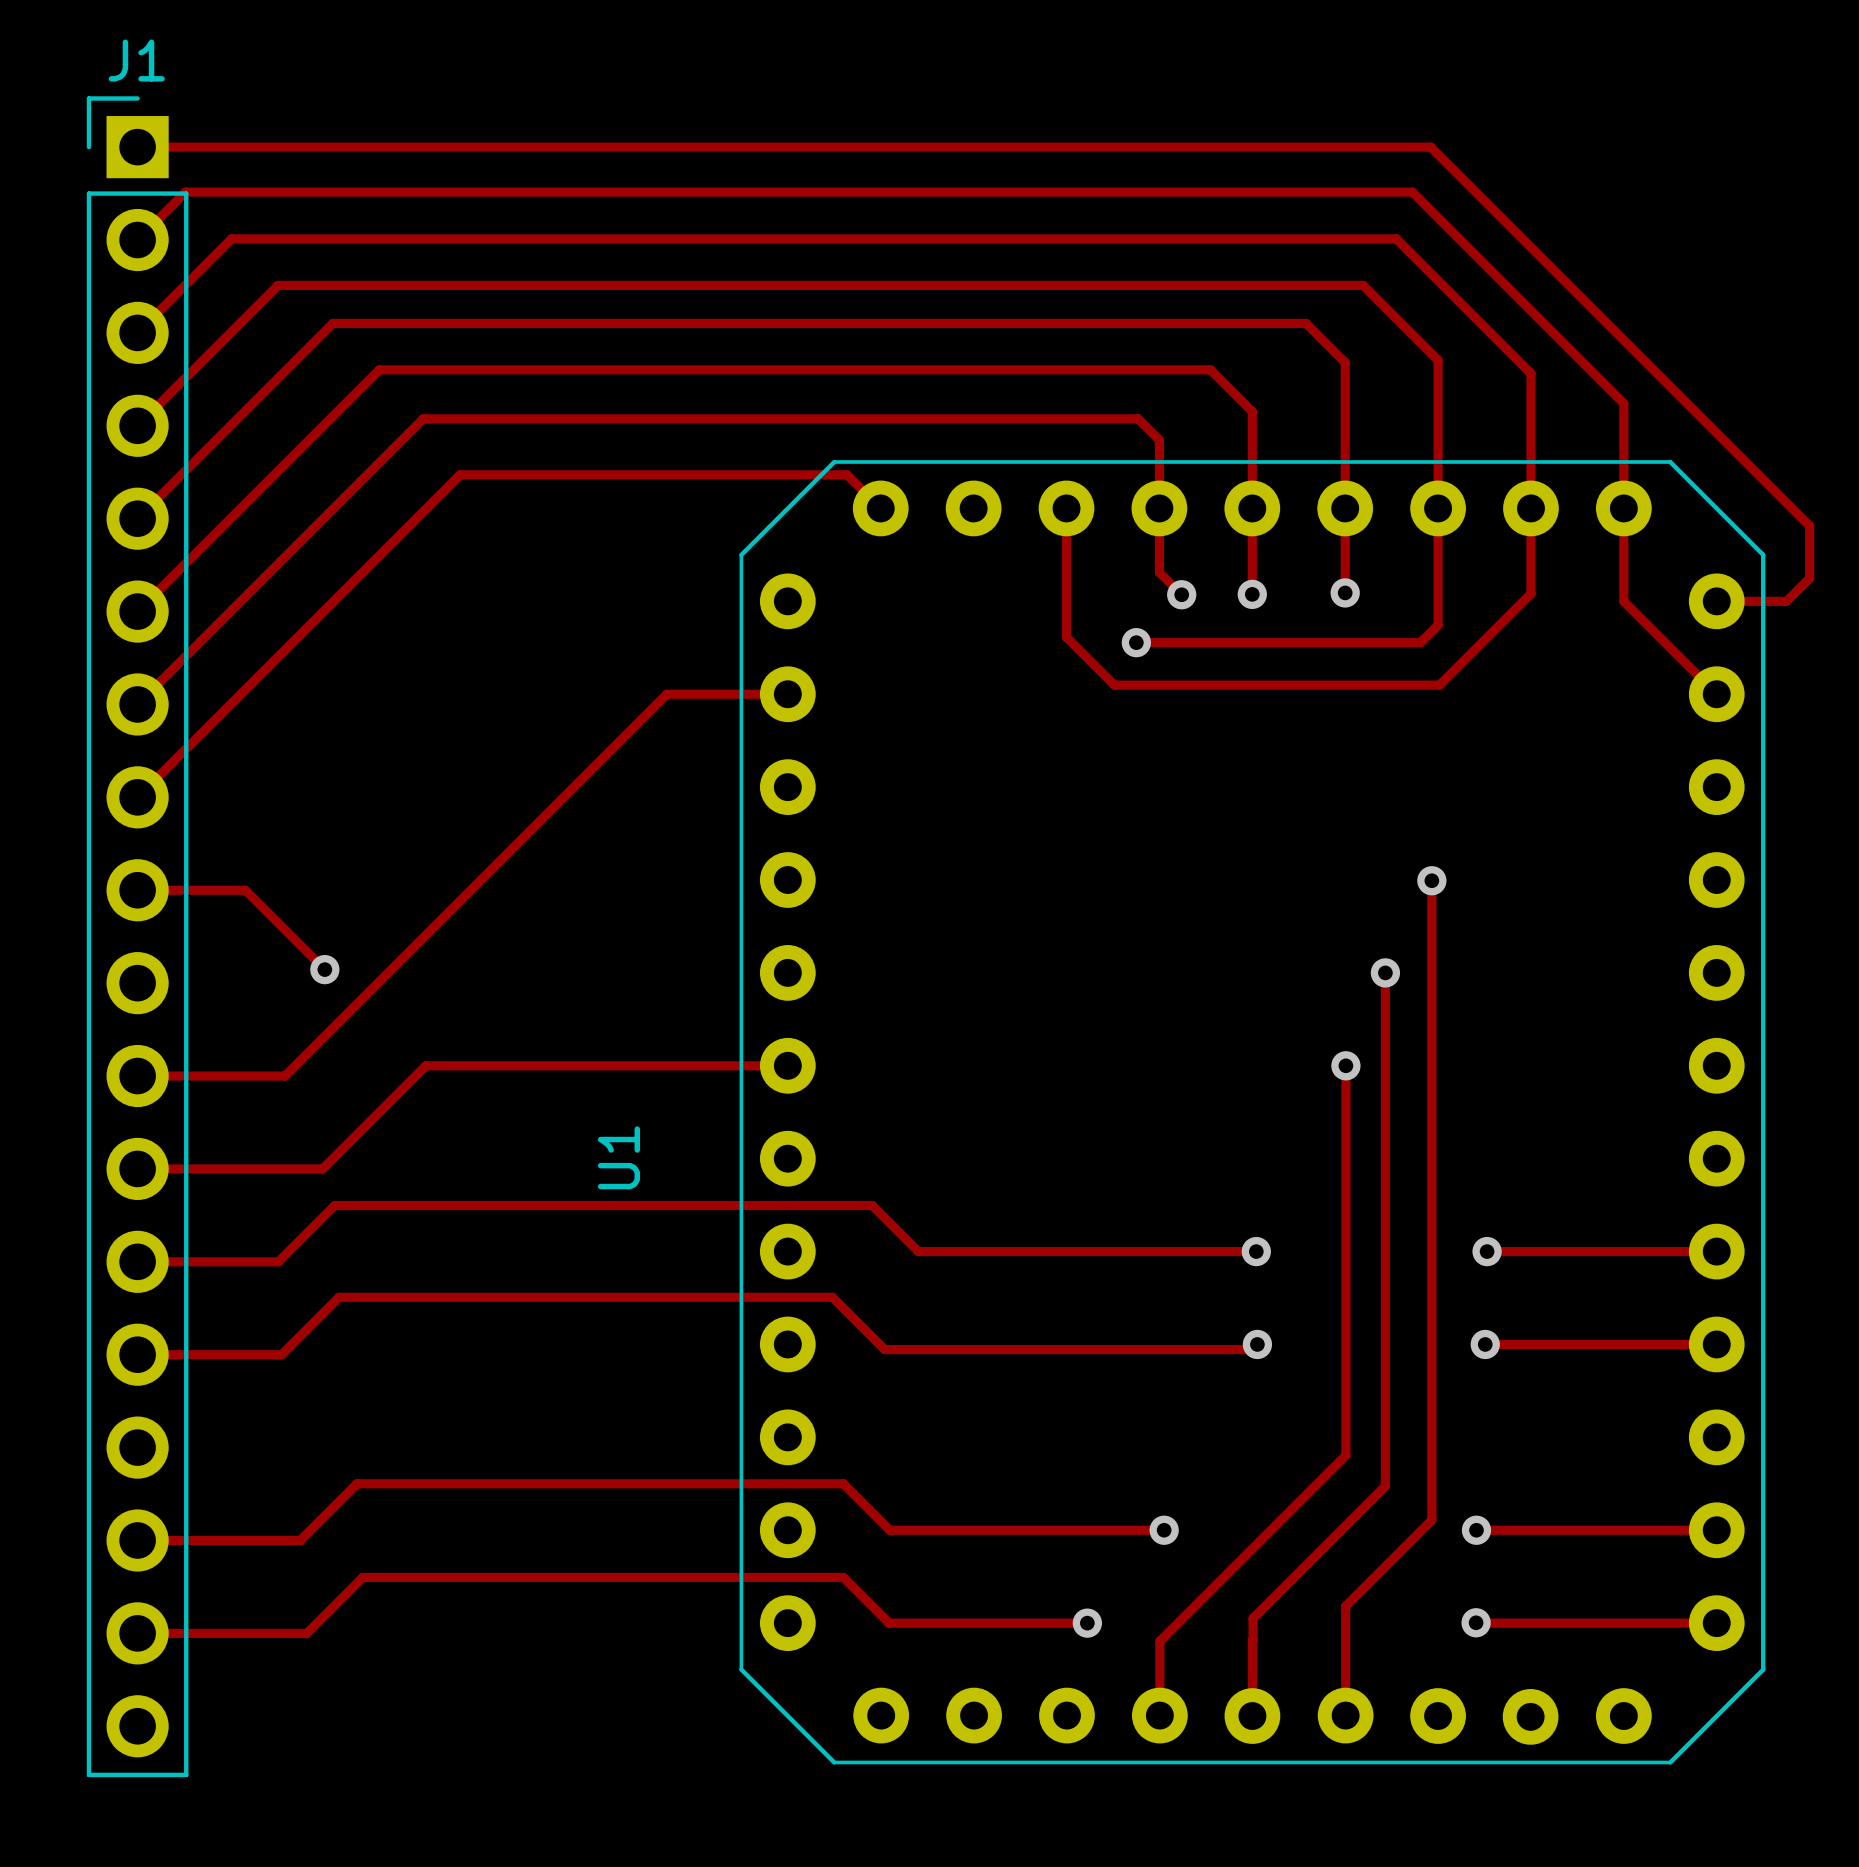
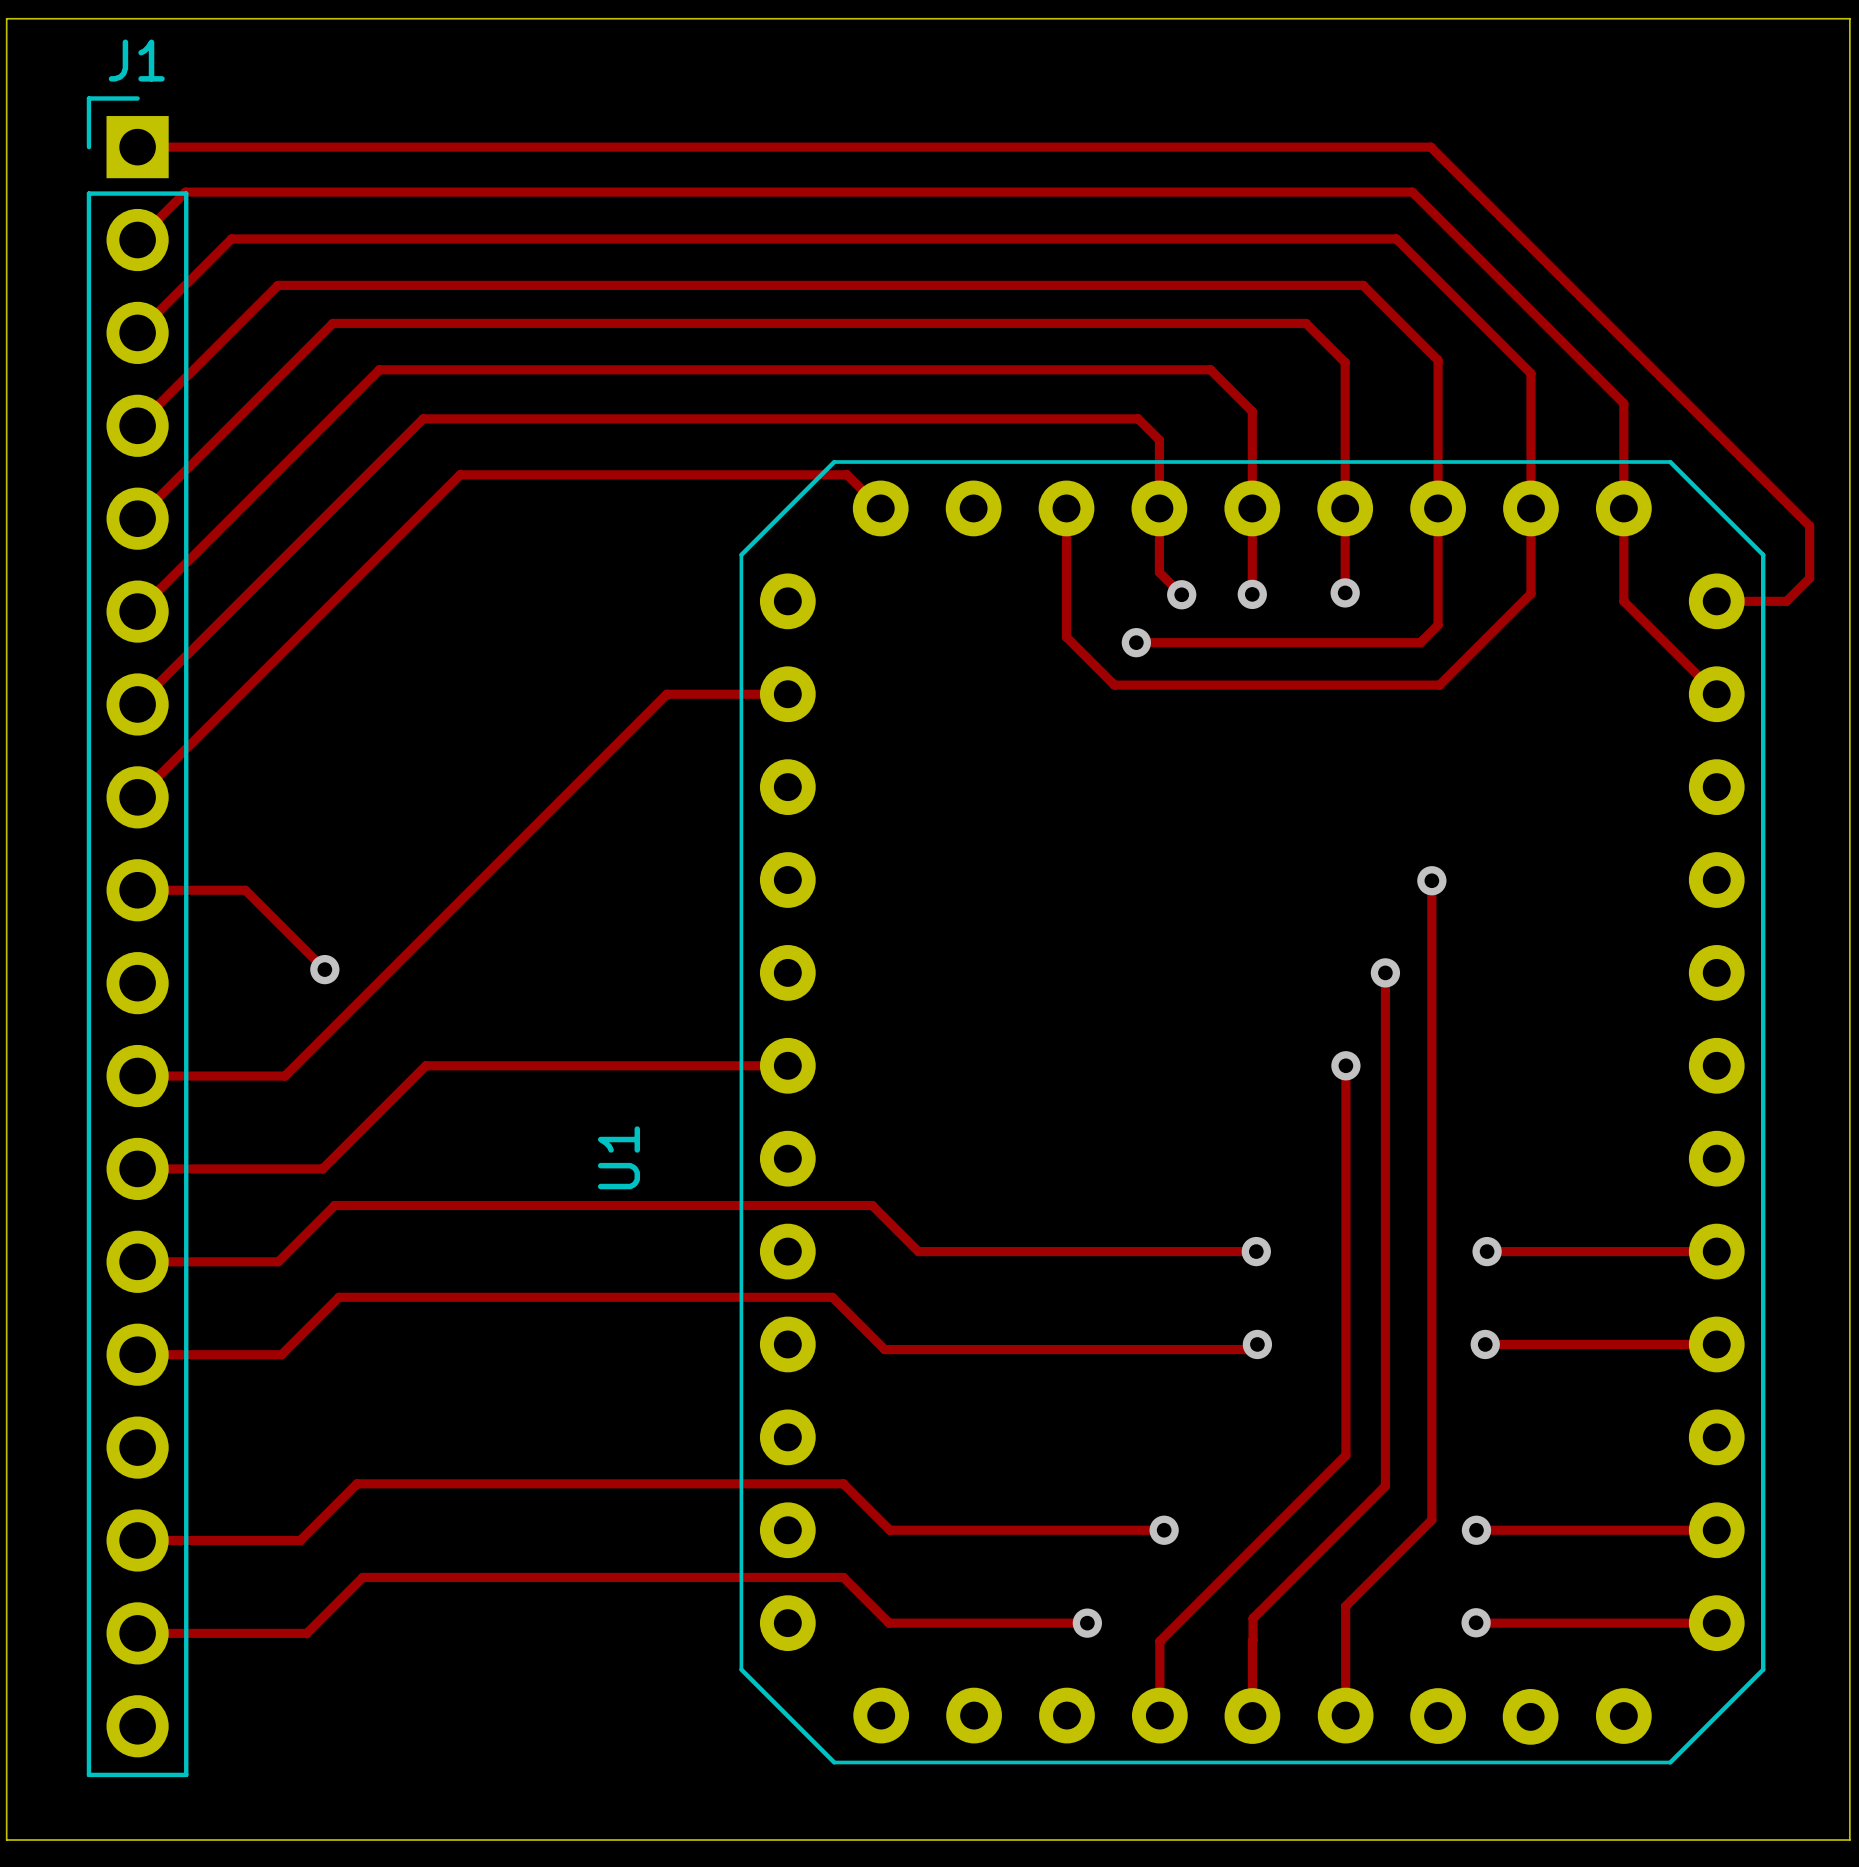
board edge: none -> (6, 18) (1849, 18) (1849, 1840) (6, 1840) (6, 18)

